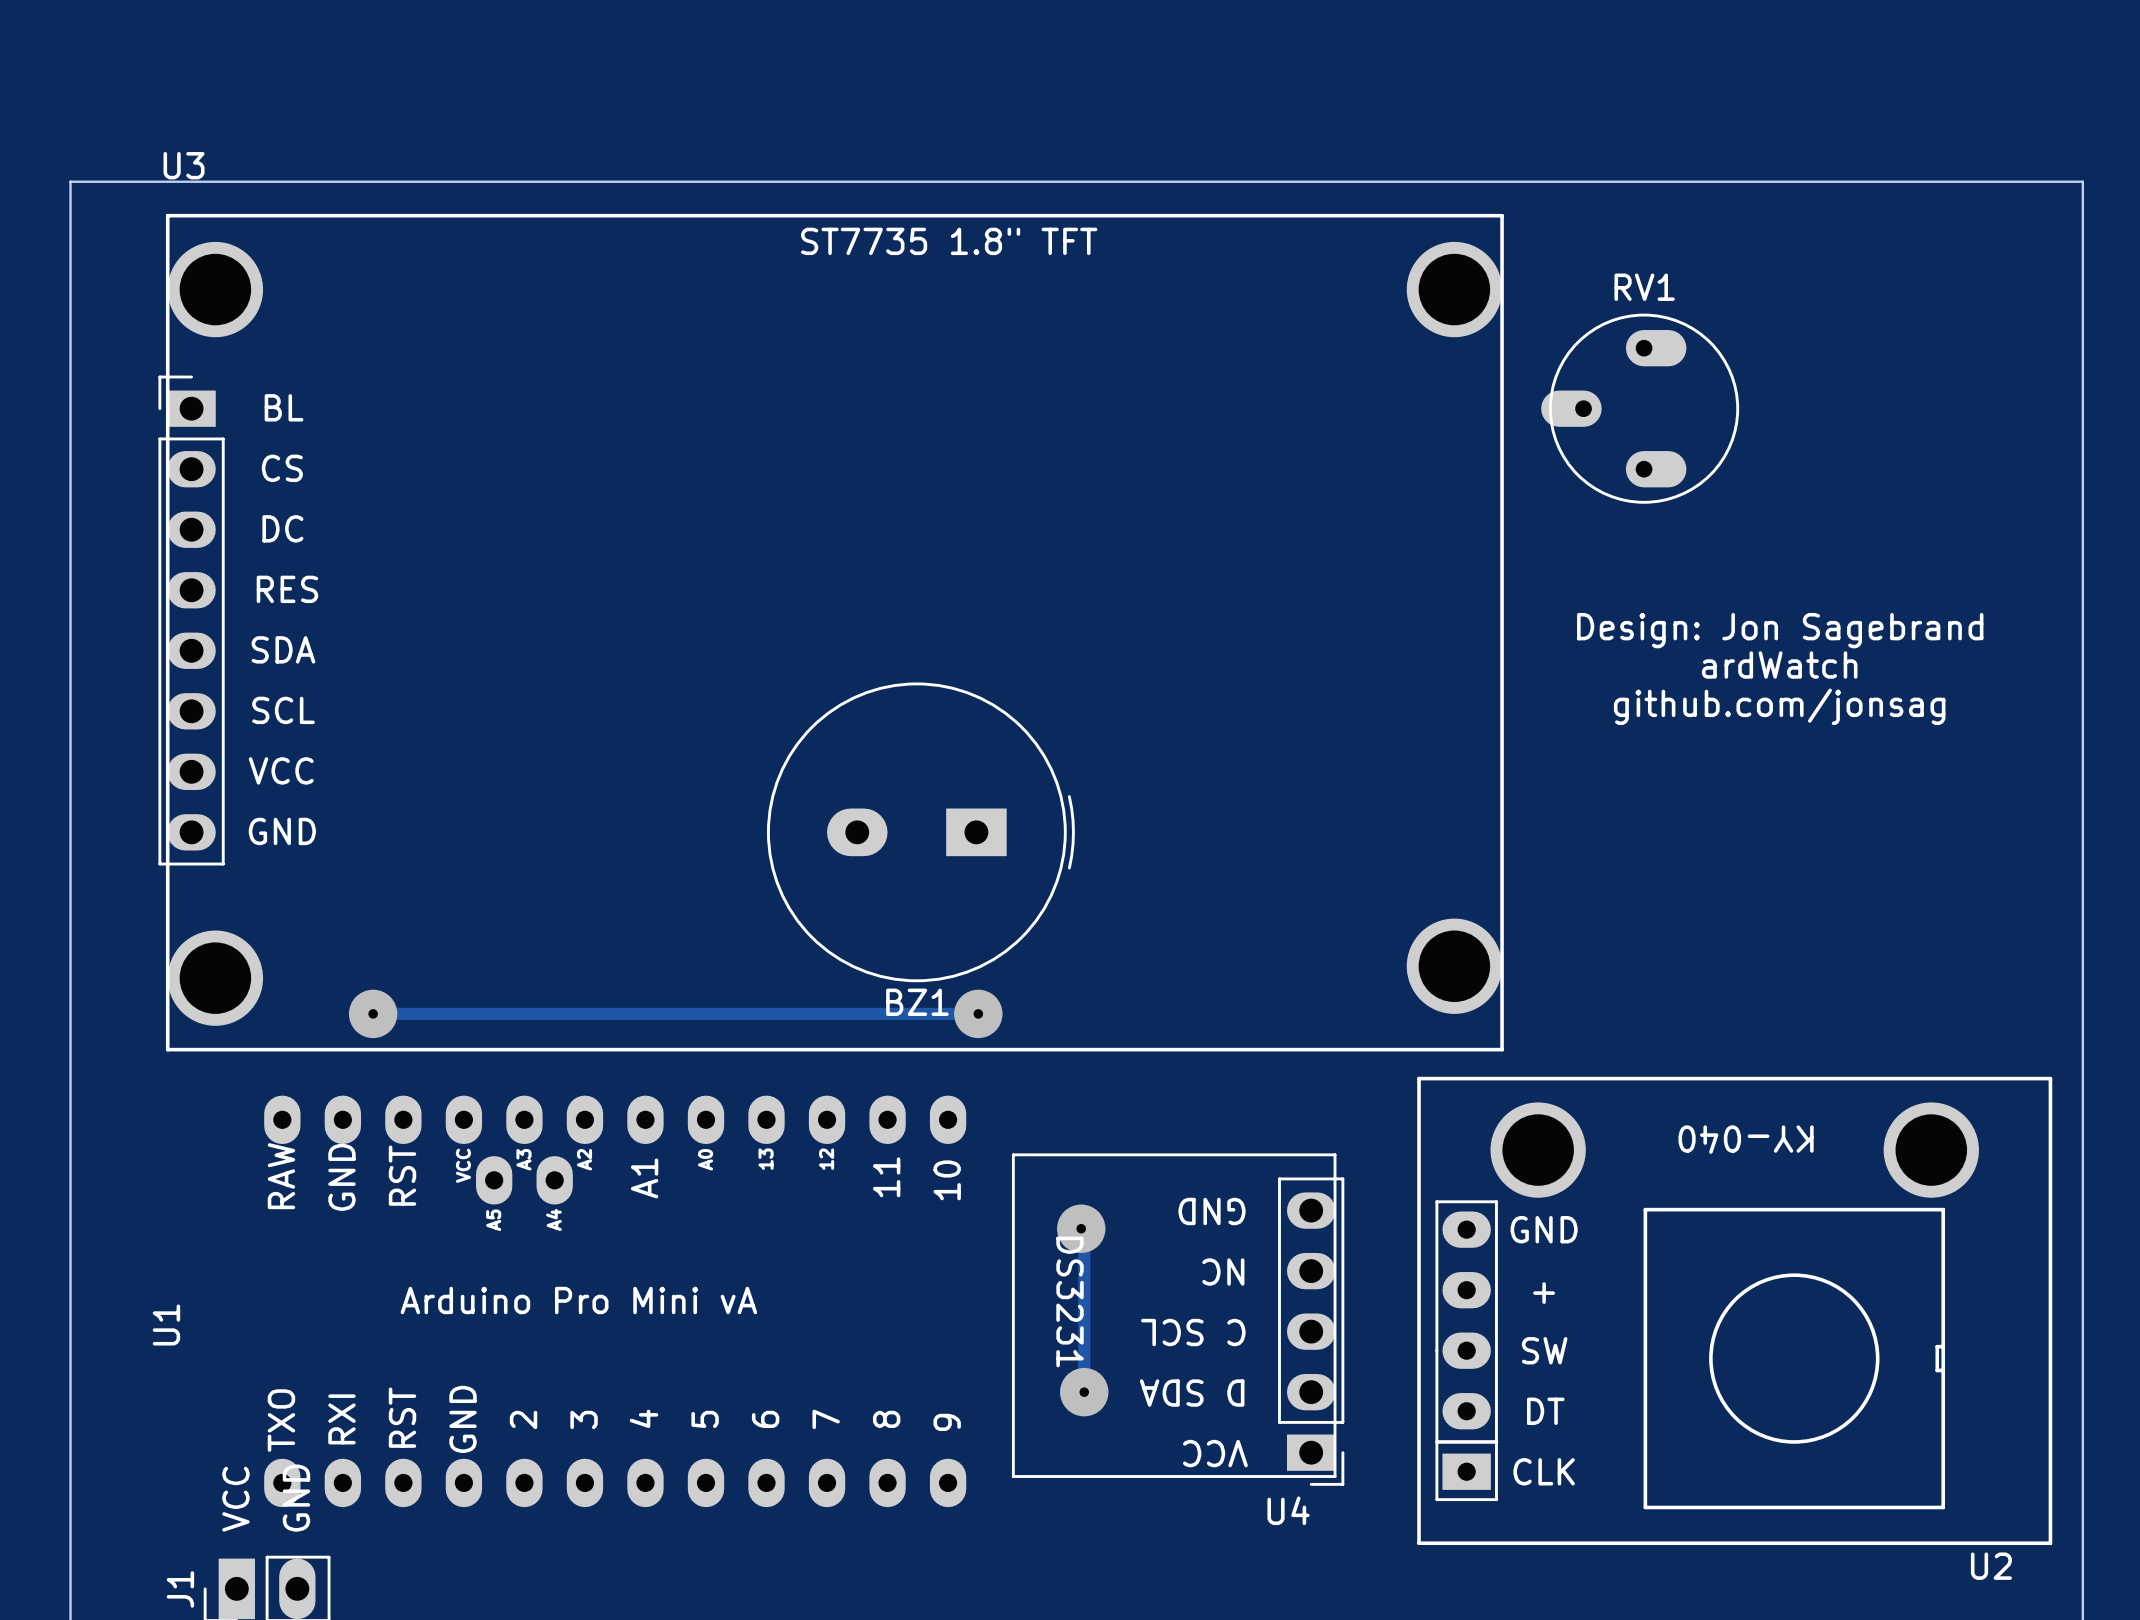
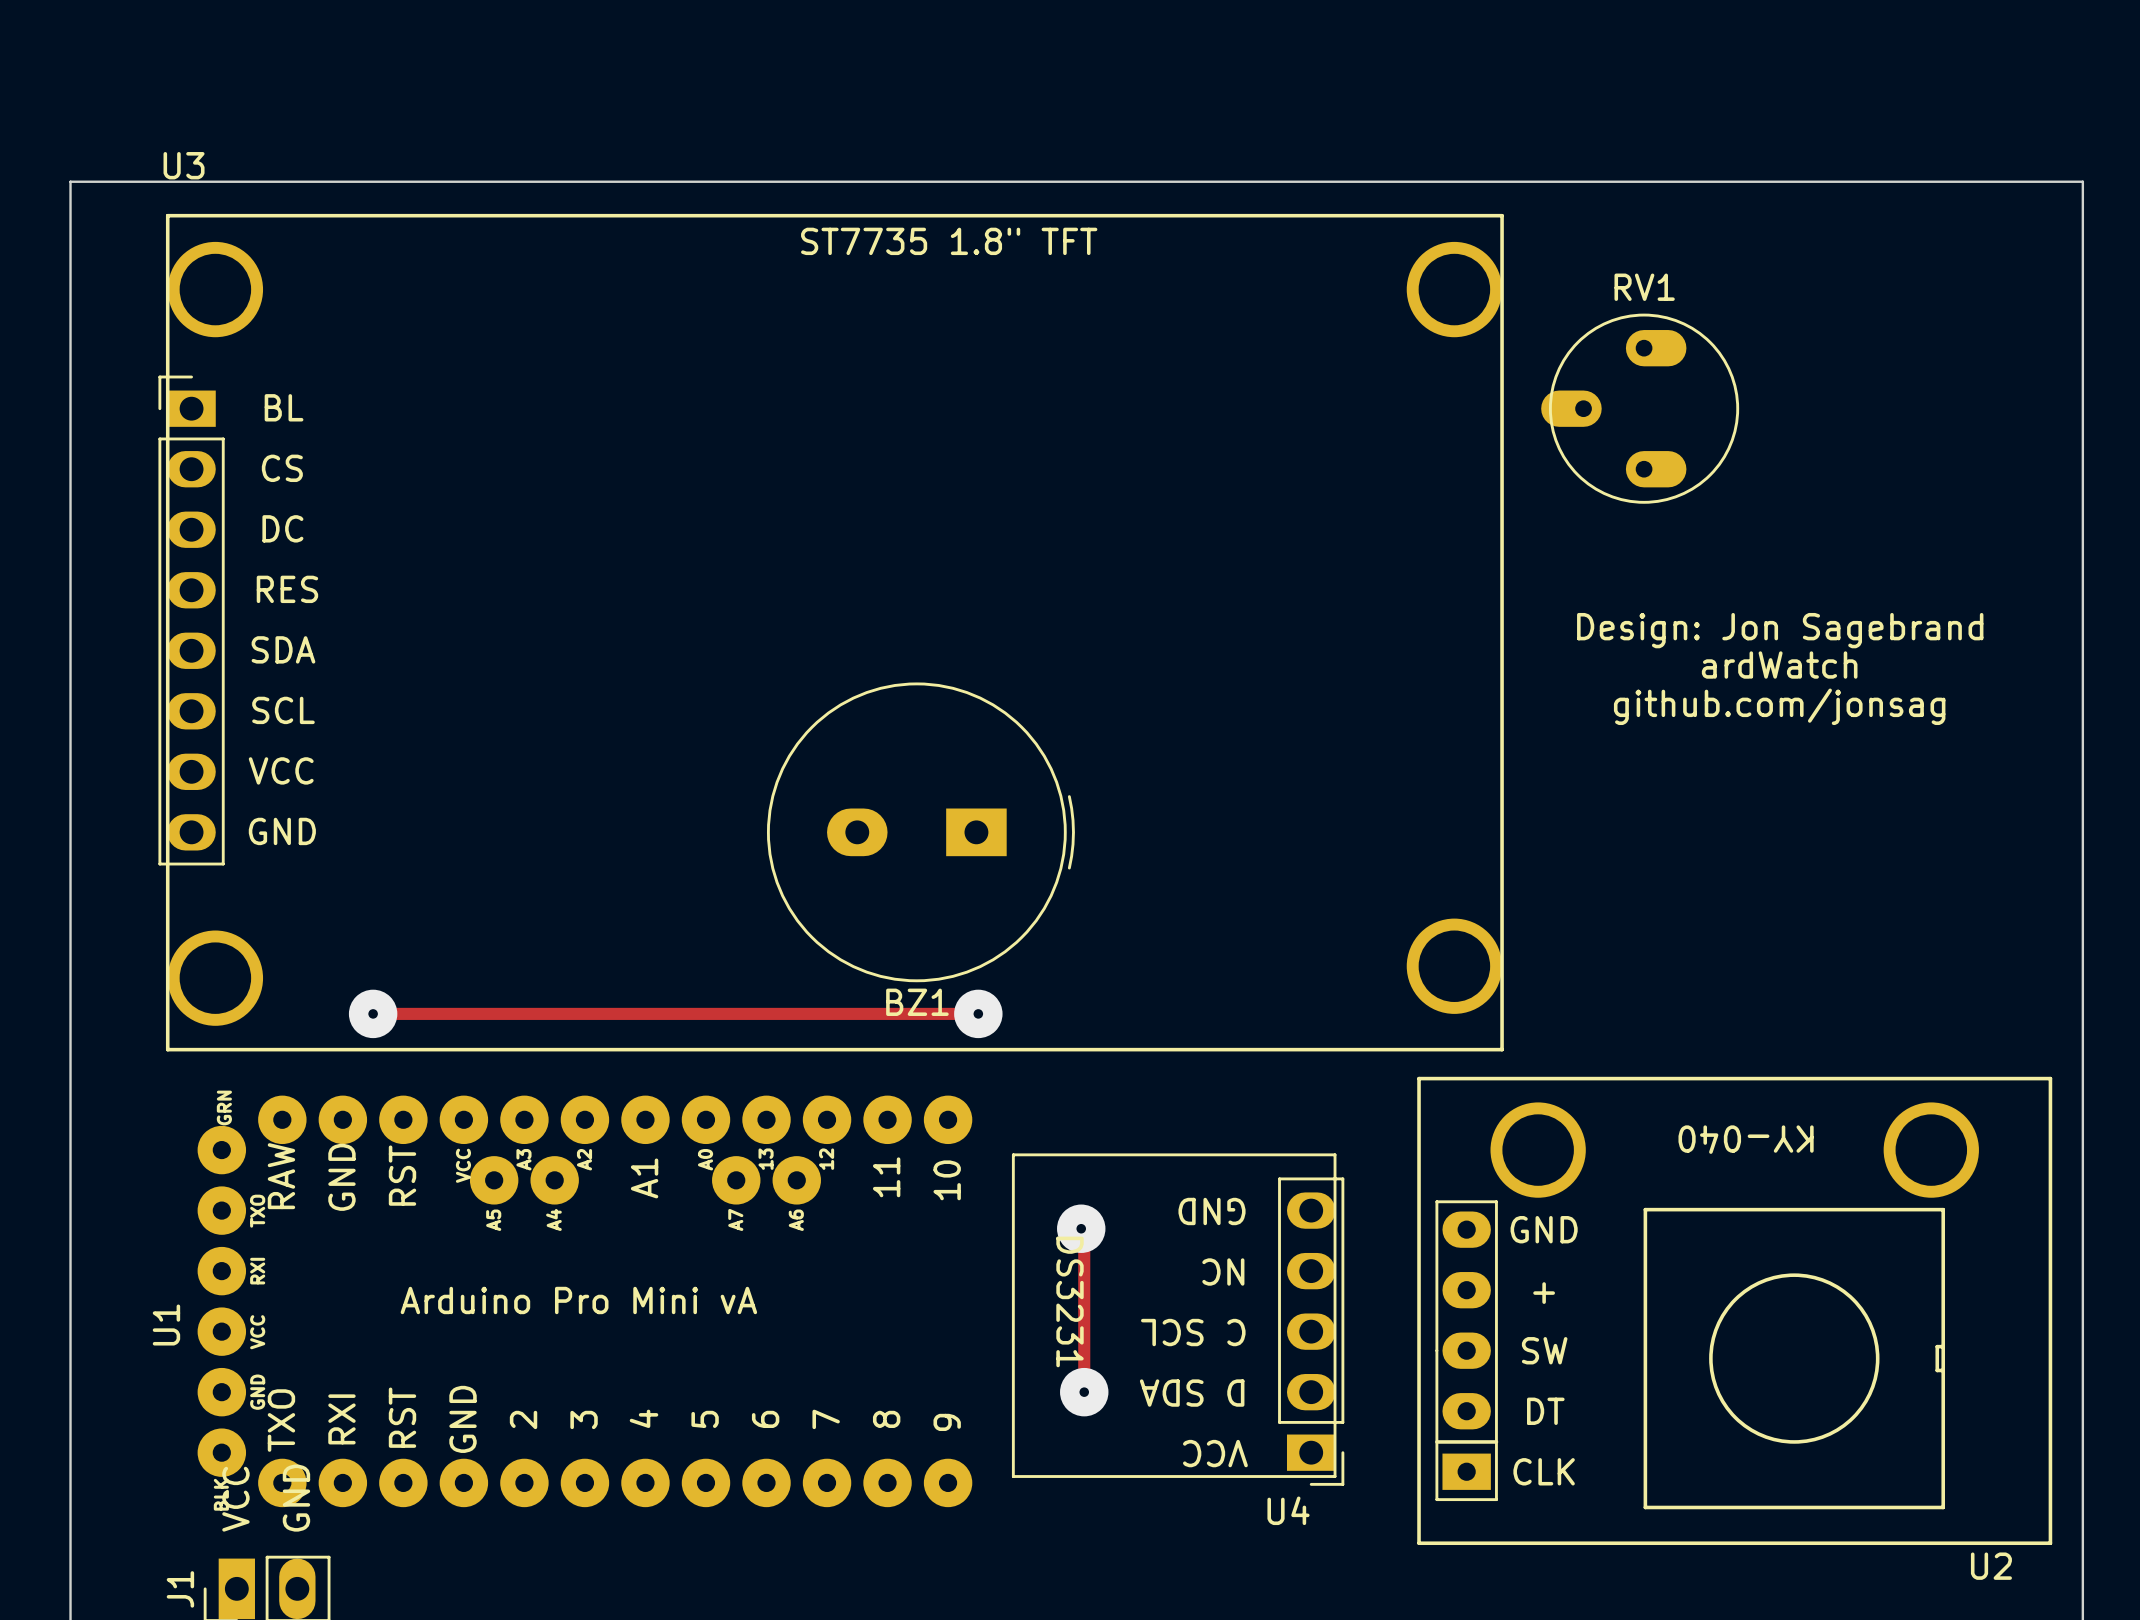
U1 footprint: [264, 1095, 967, 1508] -> [197, 1095, 973, 1508]

